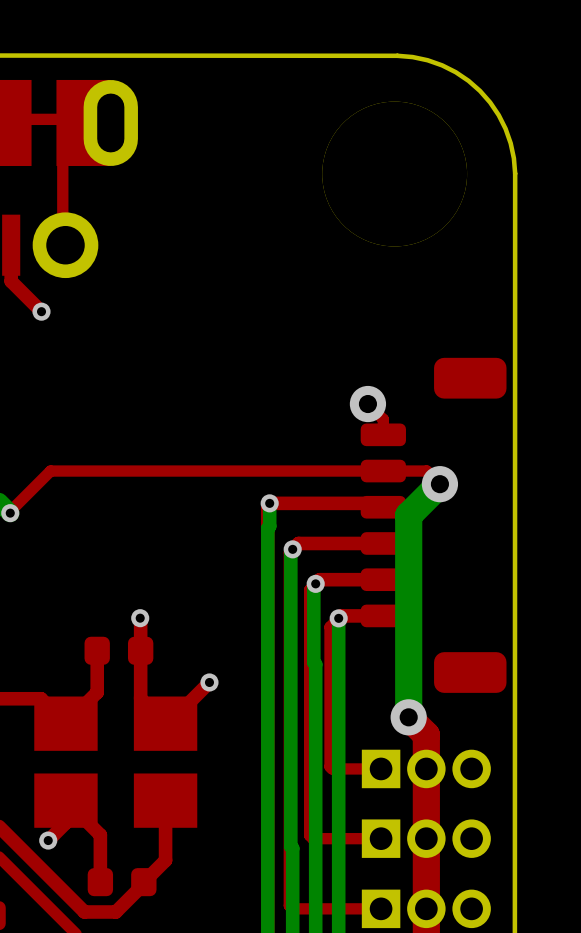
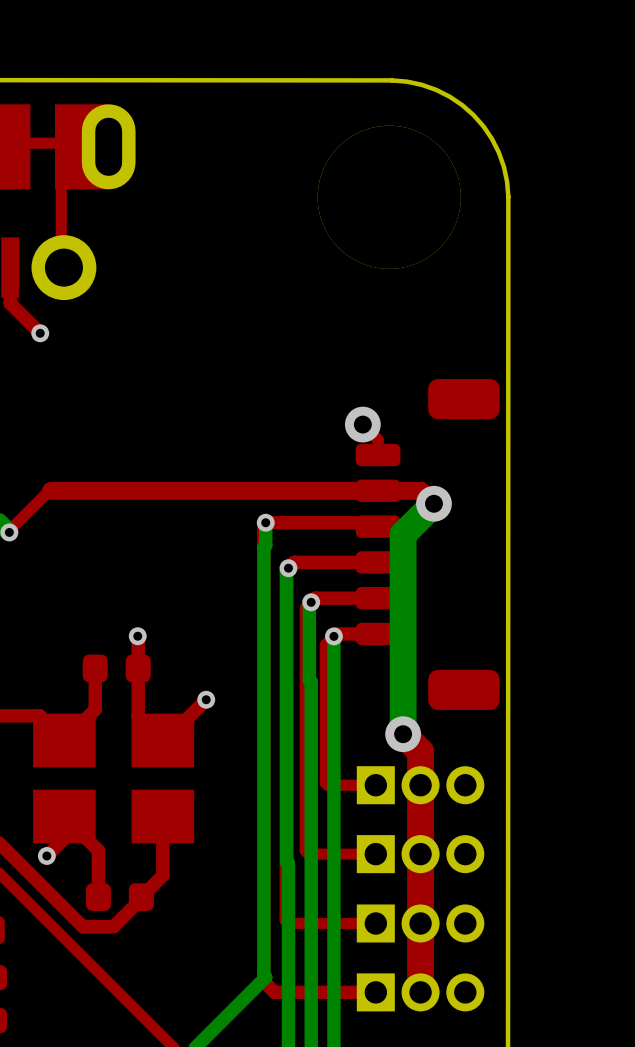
top track width: thin (52, 471) (426, 471) (439, 484) -> thick (50, 490) (421, 490) (433, 503)

